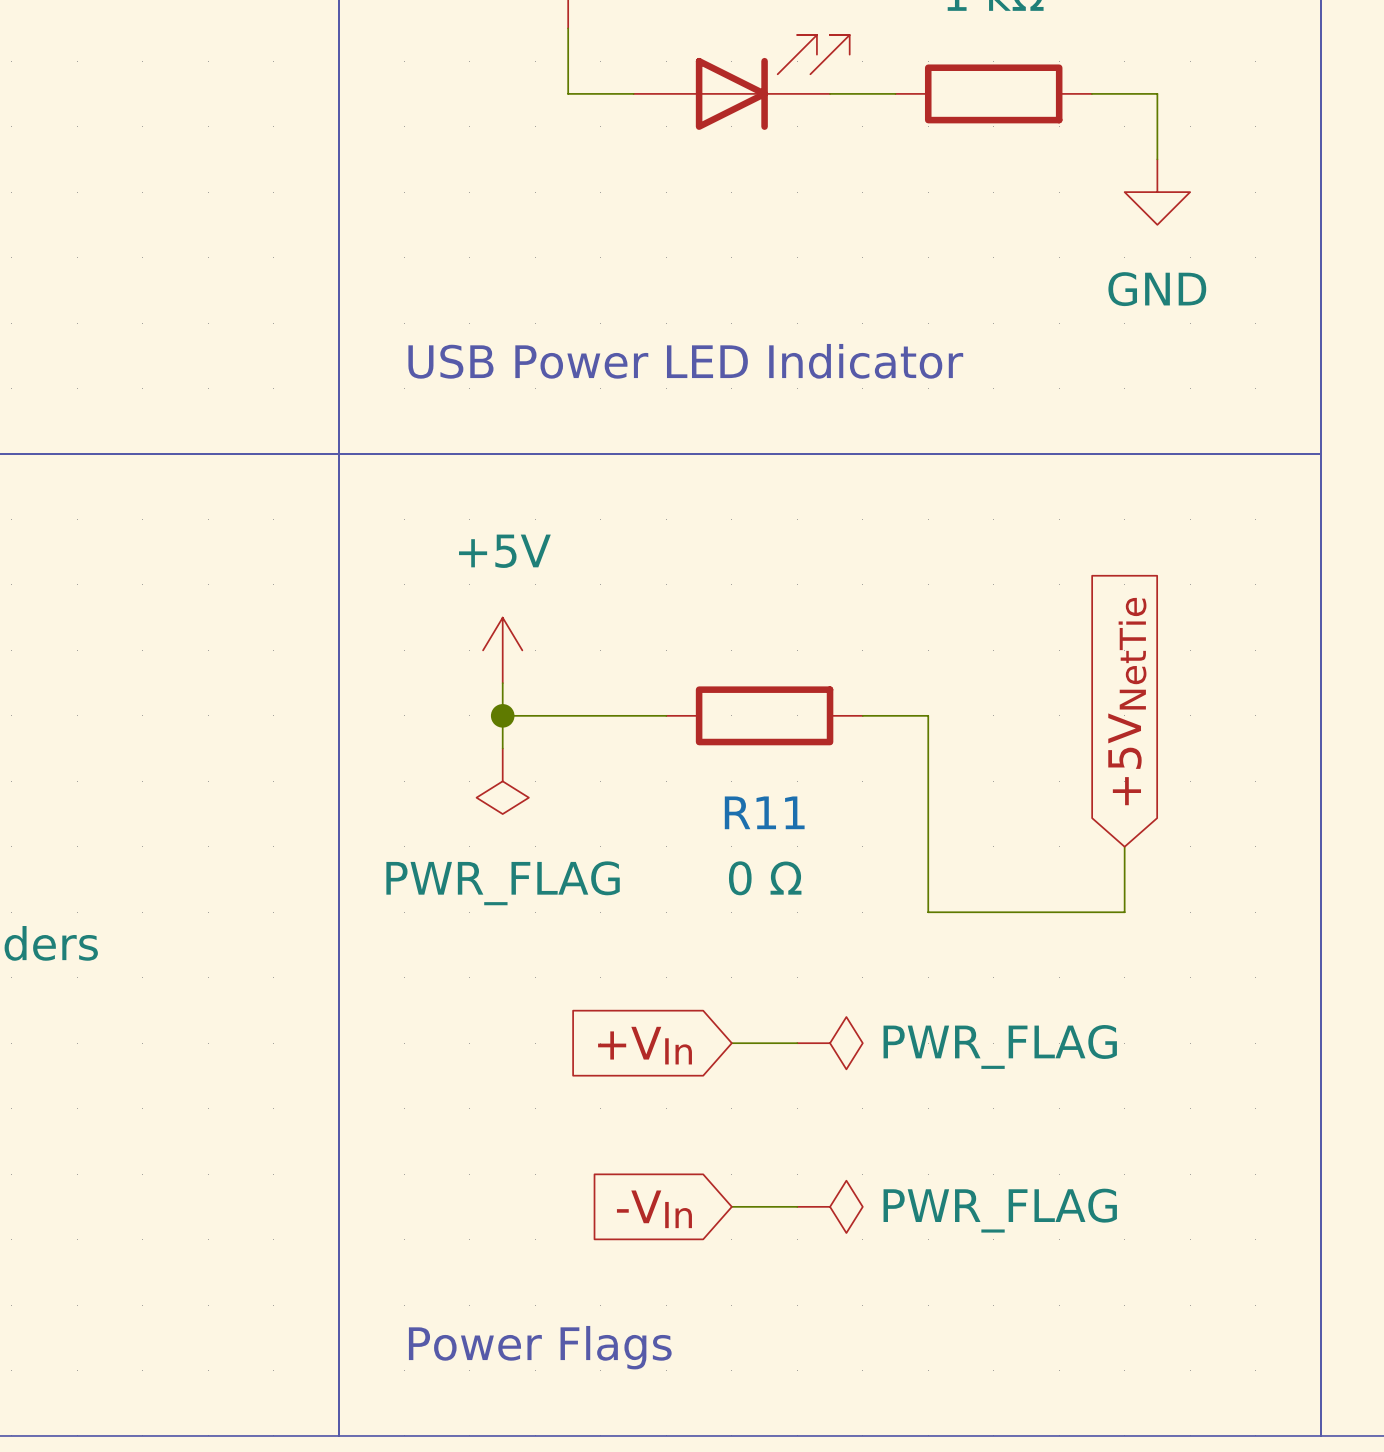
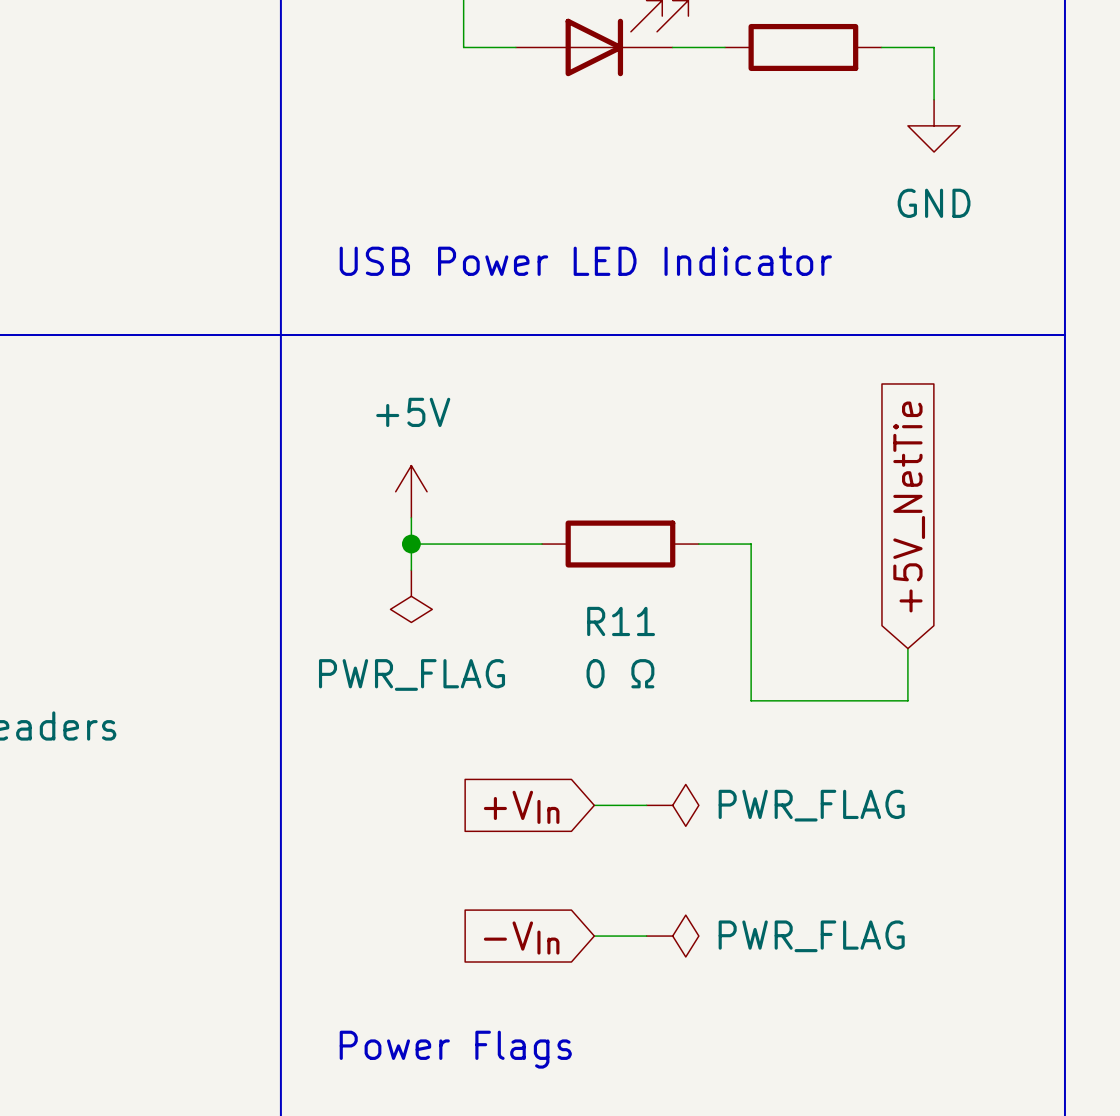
global label: +5VNetTie (1127, 701) -> +5V_NetTie (909, 506)

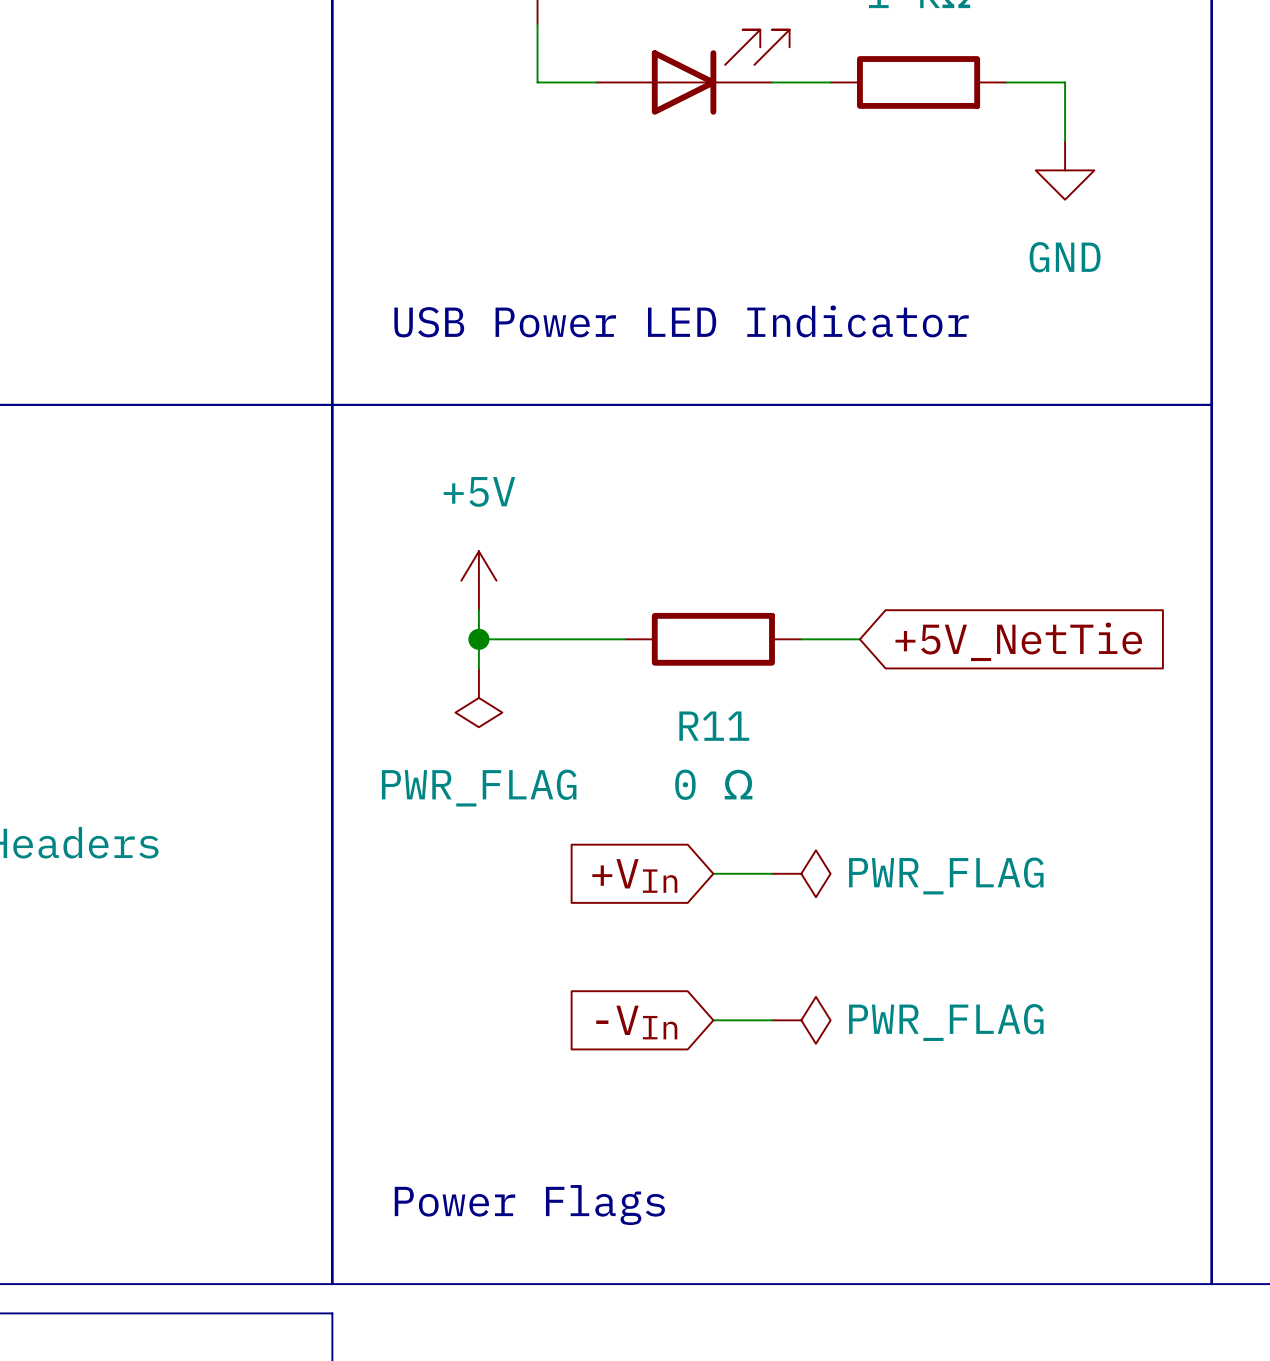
global label rotation: 0° (909, 506) -> 90° clockwise (1018, 641)
wire: (751, 544) (751, 700) (907, 700) (907, 648) -> none
power symbol: none -> PWR_FLAG (801, 873)
wire: (594, 805) (646, 805) -> (713, 873) (772, 873)
power symbol: PWR_FLAG (672, 805) -> none
global label position: +VIn (521, 807) -> +VIn (634, 875)
power symbol: none -> PWR_FLAG (801, 1020)
wire: (594, 936) (646, 936) -> (713, 1020) (772, 1020)
power symbol: PWR_FLAG (672, 936) -> none
global label position: -VIn (521, 938) -> -VIn (636, 1022)

